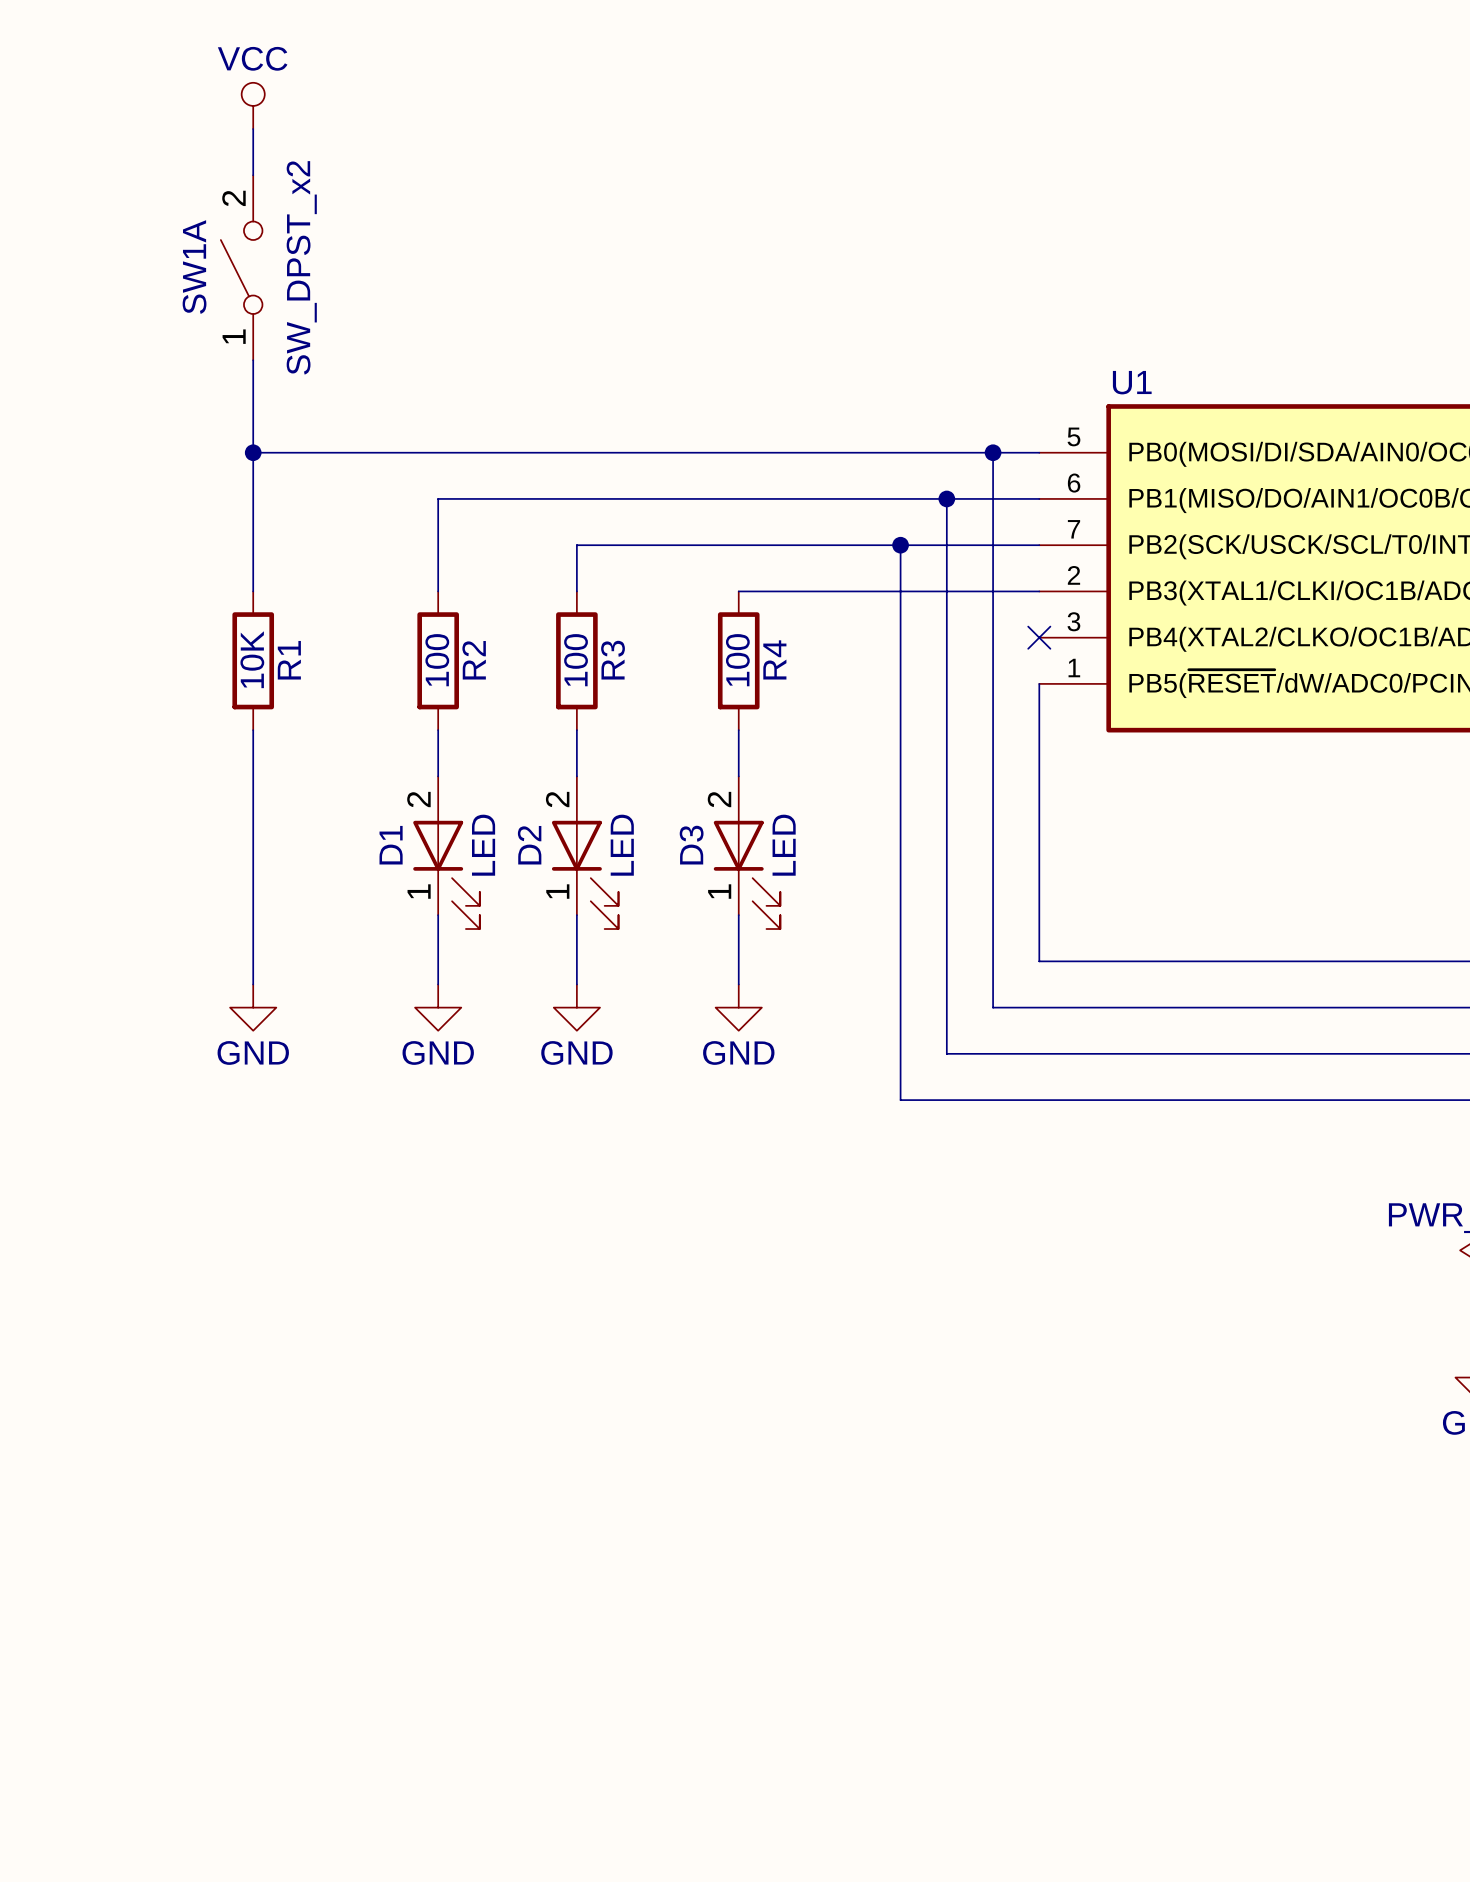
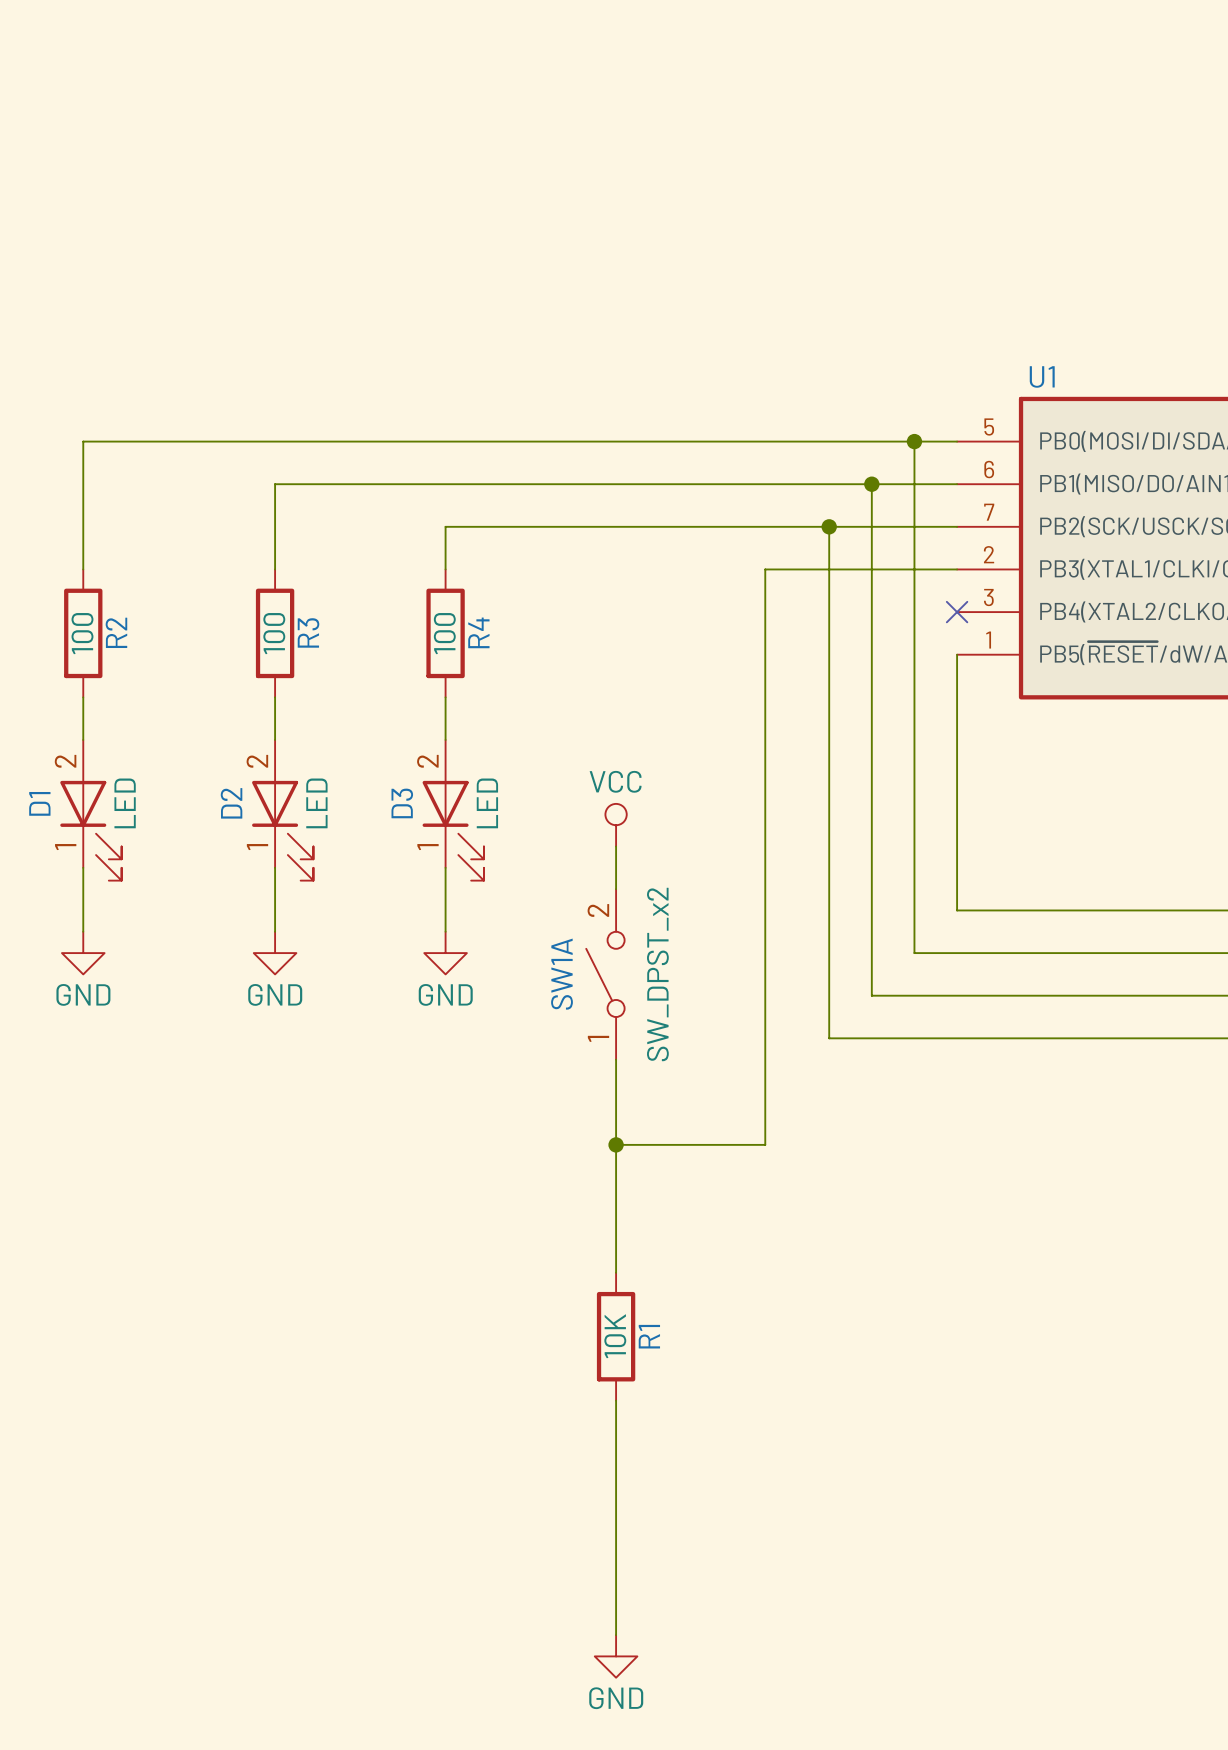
power symbol: VCC (253, 105) -> none
wire: (253, 129) (253, 175) -> none
SW1A position: (241, 267) -> (605, 974)
wire: (253, 360) (253, 591) -> none
wire: none -> (232, 441) (83, 441) (83, 569)
junction: (253, 452) -> none
wire: (438, 498) (438, 591) -> (402, 484) (275, 484) (275, 569)
wire: (576, 545) (576, 591) -> (530, 526) (445, 526) (445, 569)
wire: (738, 591) (831, 591) -> (616, 1144) (765, 1144) (765, 569)
R1 position: (253, 660) -> (616, 1336)
R2 position: (438, 660) -> (83, 633)
R3 position: (576, 660) -> (275, 633)
R4 position: (738, 660) -> (445, 633)
wire: none -> (83, 697) (83, 739)
wire: (253, 730) (253, 984) -> none
wire: (438, 730) (438, 776) -> (445, 697) (445, 739)
wire: (576, 730) (576, 776) -> (275, 697) (275, 739)
wire: (738, 730) (738, 776) -> (616, 846) (616, 889)
D1 position: (446, 852) -> (90, 810)
D2 position: (585, 852) -> (282, 810)
D3 position: (747, 852) -> (453, 810)
power symbol: none -> VCC (616, 825)
wire: none -> (83, 867) (83, 931)
wire: (438, 915) (438, 984) -> (445, 867) (445, 931)
wire: (576, 915) (576, 984) -> (275, 867) (275, 931)
wire: (738, 915) (738, 984) -> none
power symbol: none -> GND (83, 953)
power symbol position: GND (253, 1007) -> GND (275, 953)
power symbol: GND (438, 1007) -> none
power symbol: none -> GND (445, 953)
power symbol: GND (576, 1007) -> none
power symbol: GND (738, 1007) -> none
wire: none -> (616, 1059) (616, 1272)
junction: none -> (616, 1144)
wire: none -> (616, 1400) (616, 1635)
power symbol: none -> GND (616, 1656)

